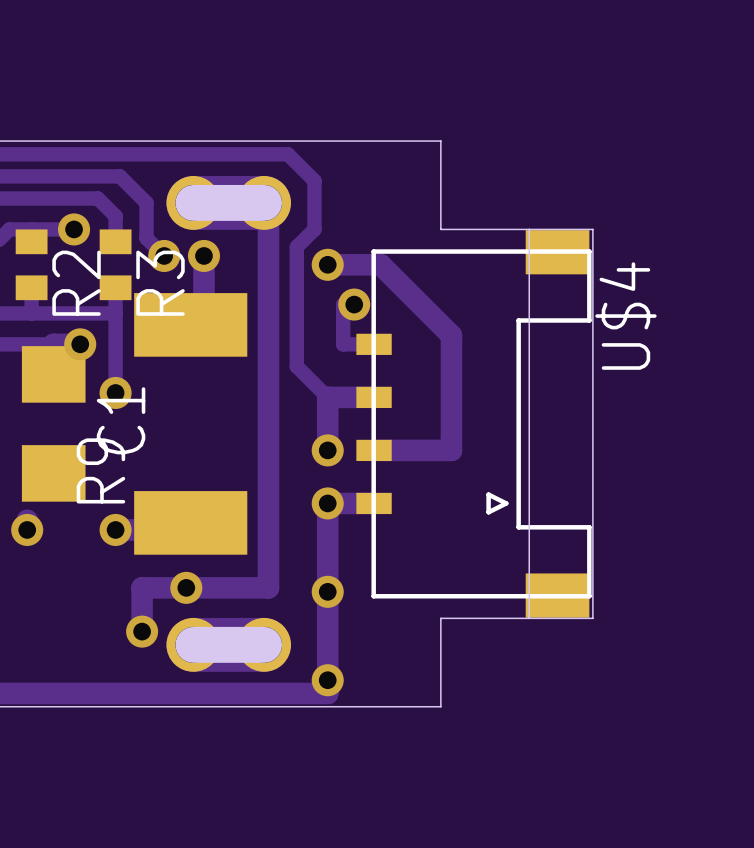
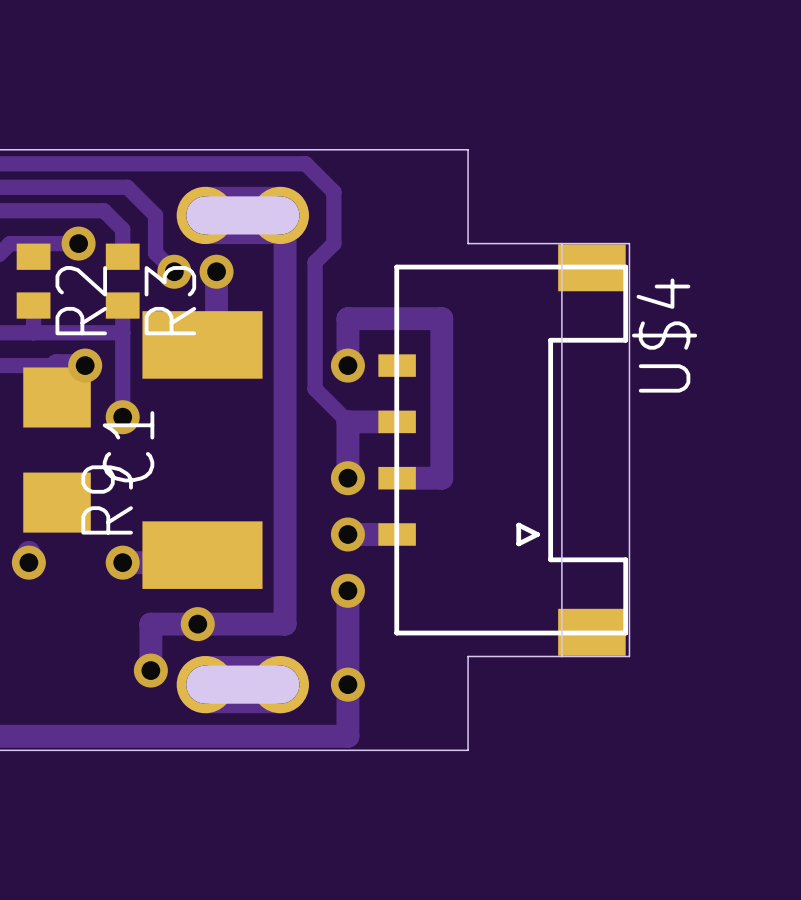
track: (327, 264) (380, 264) (451, 335) (451, 450) (416, 450) -> (347, 365) (347, 318) (441, 318) (441, 478)
via: (327, 264) -> none
track: (354, 304) (343, 304) (343, 344) (374, 344) -> none
via: (354, 304) -> none
via: none -> (347, 365)
track: (327, 503) (327, 556) -> none
via: none -> (347, 590)
via: (327, 591) -> none
via: none -> (347, 684)
via: (327, 680) -> none

